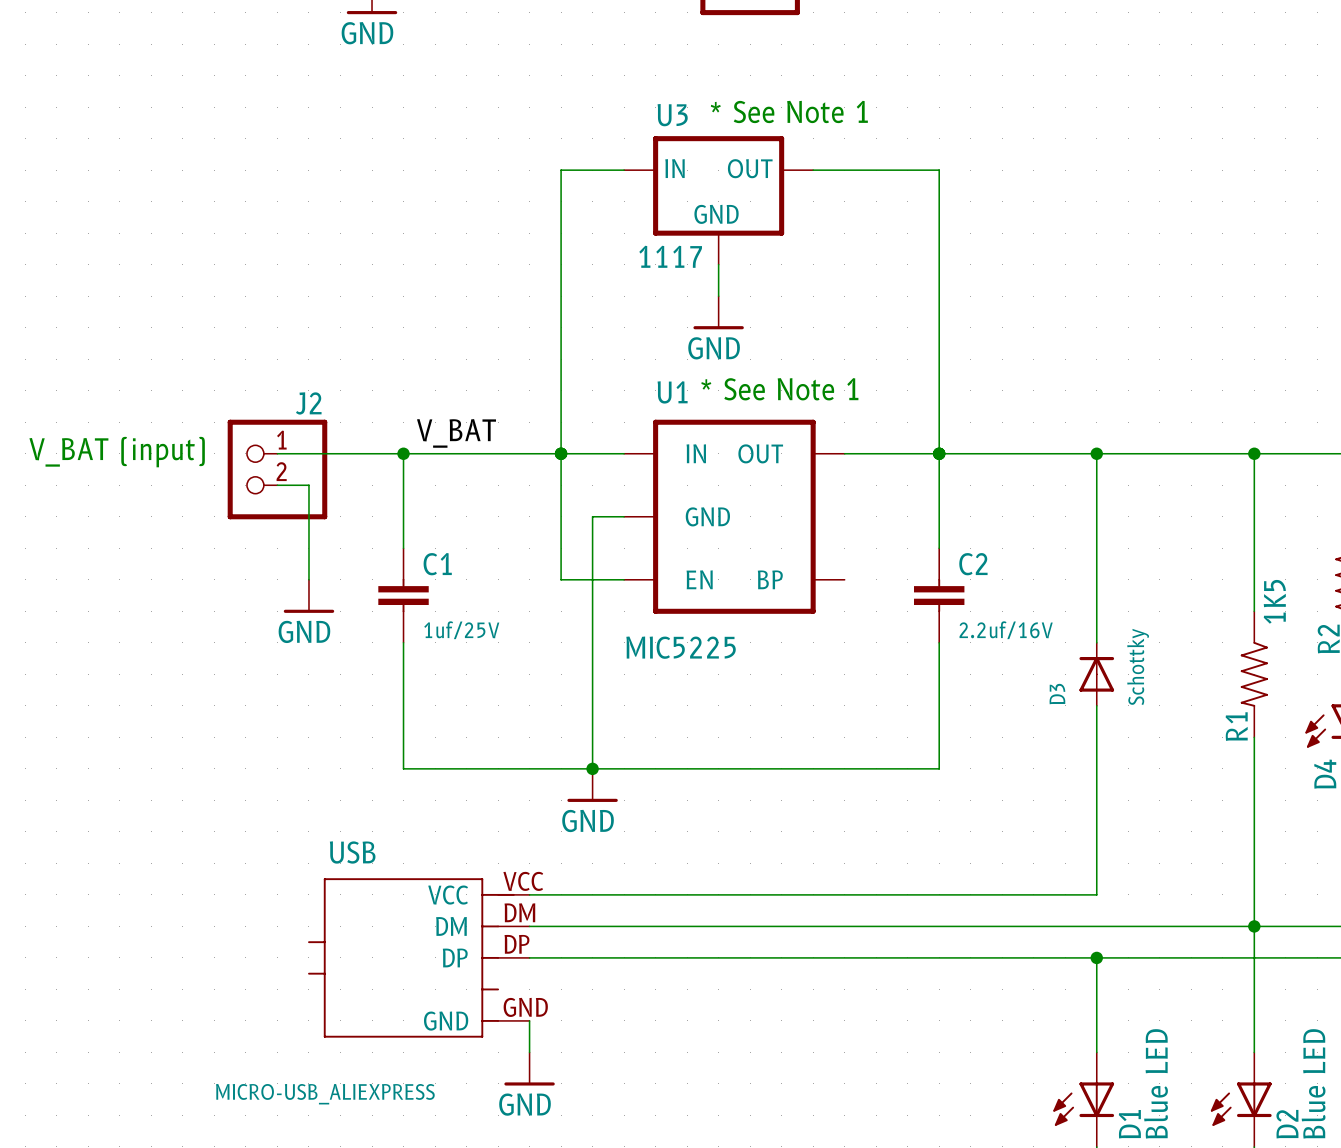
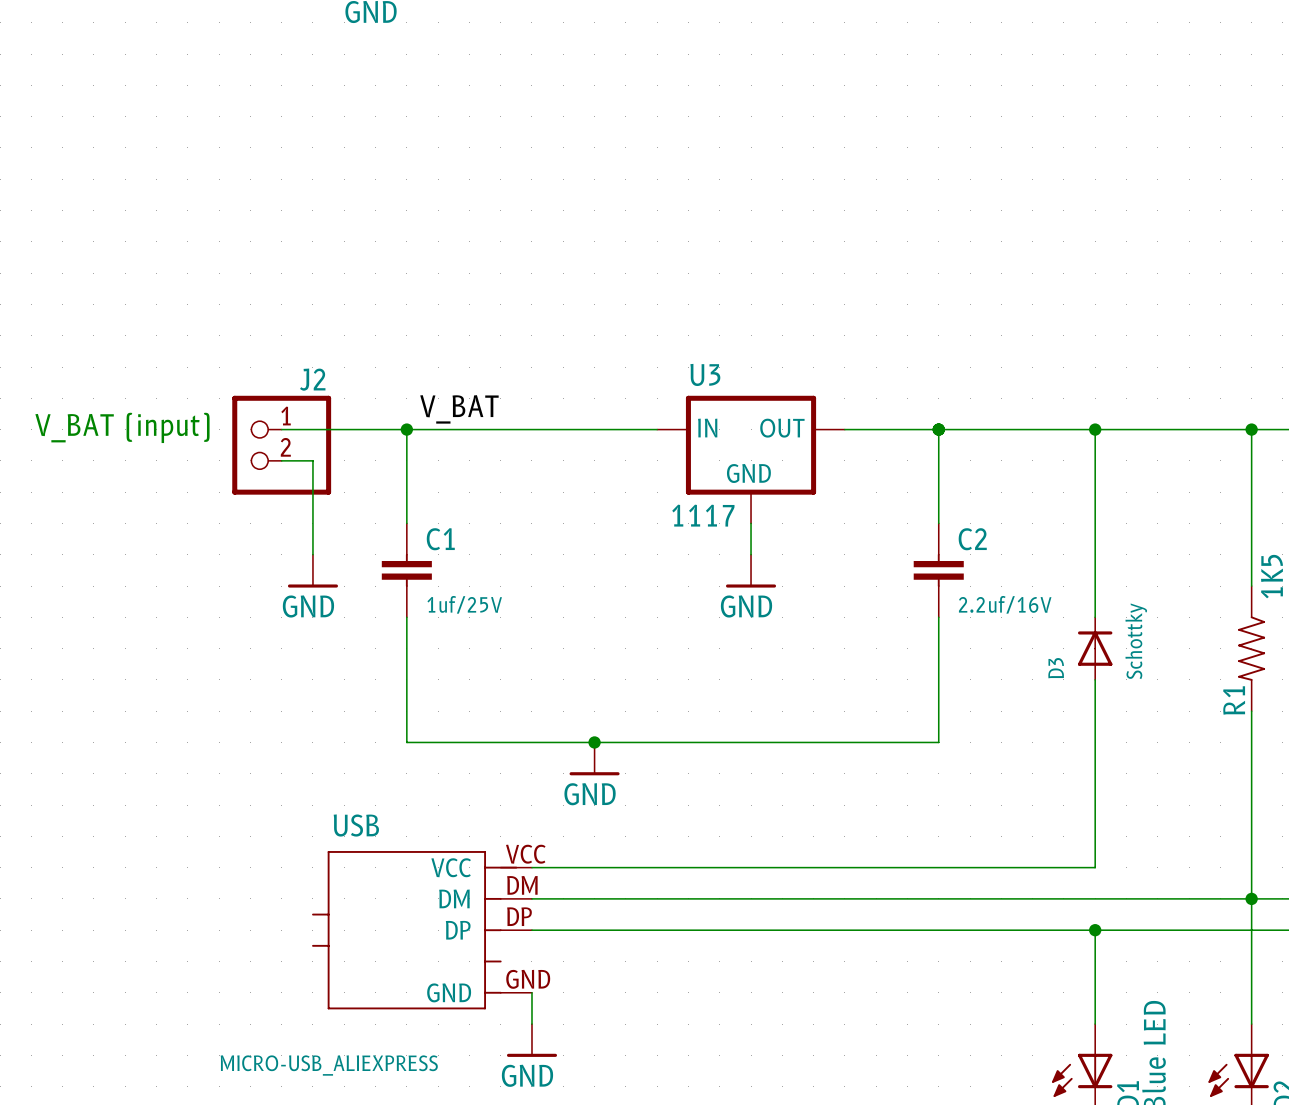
text: * See Note 1 (789, 111) -> none
wire: (624, 170) (561, 170) (561, 579) (624, 579) -> none
wire: (813, 170) (939, 170) (939, 453) -> none
U3 position: (718, 200) -> (751, 459)
wire: (718, 264) (718, 296) -> (751, 523) (751, 554)
power symbol position: GND (718, 312) -> GND (751, 571)
text: * See Note 1 (779, 389) -> none
junction: (561, 453) -> none
wire: (624, 516) (592, 516) (592, 768) -> none
U1: MIC5225 (734, 516) -> none

